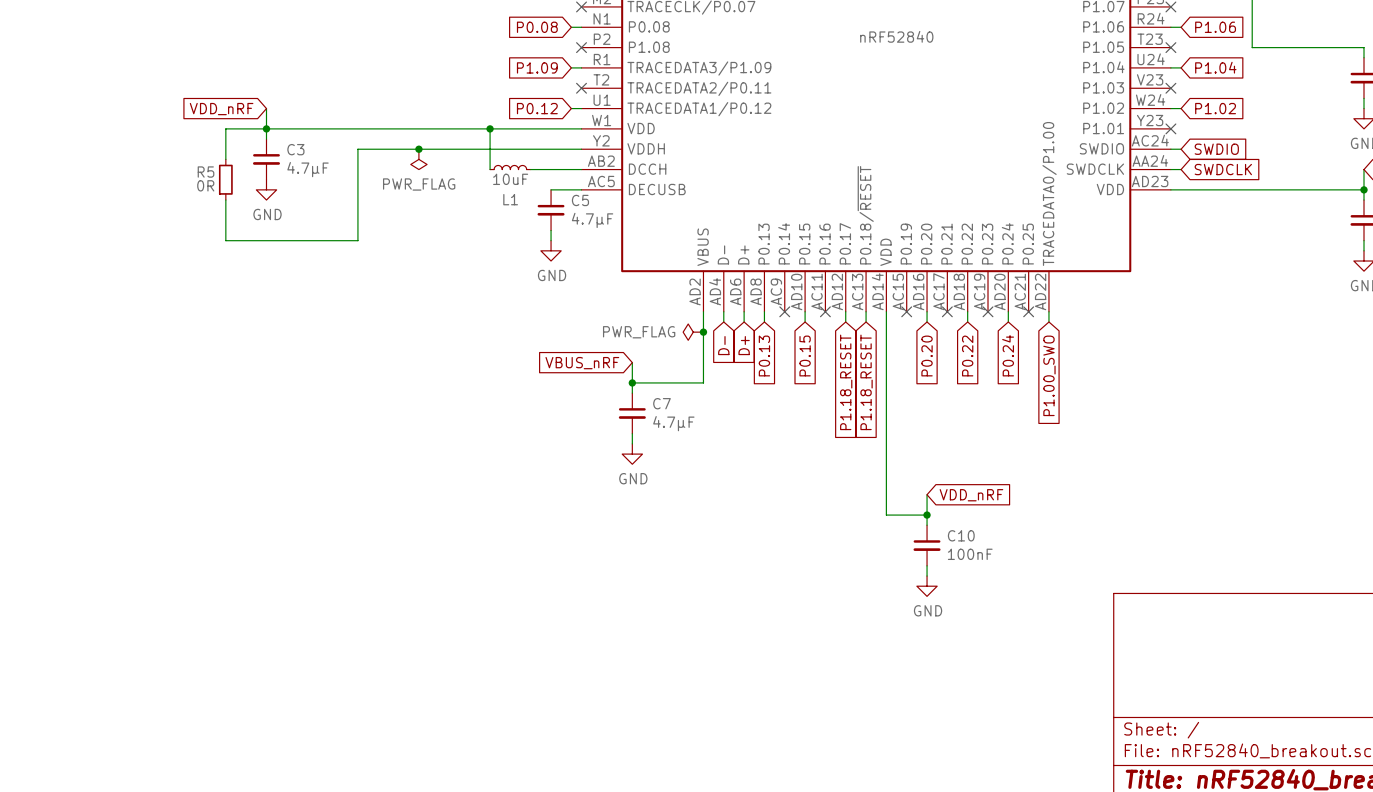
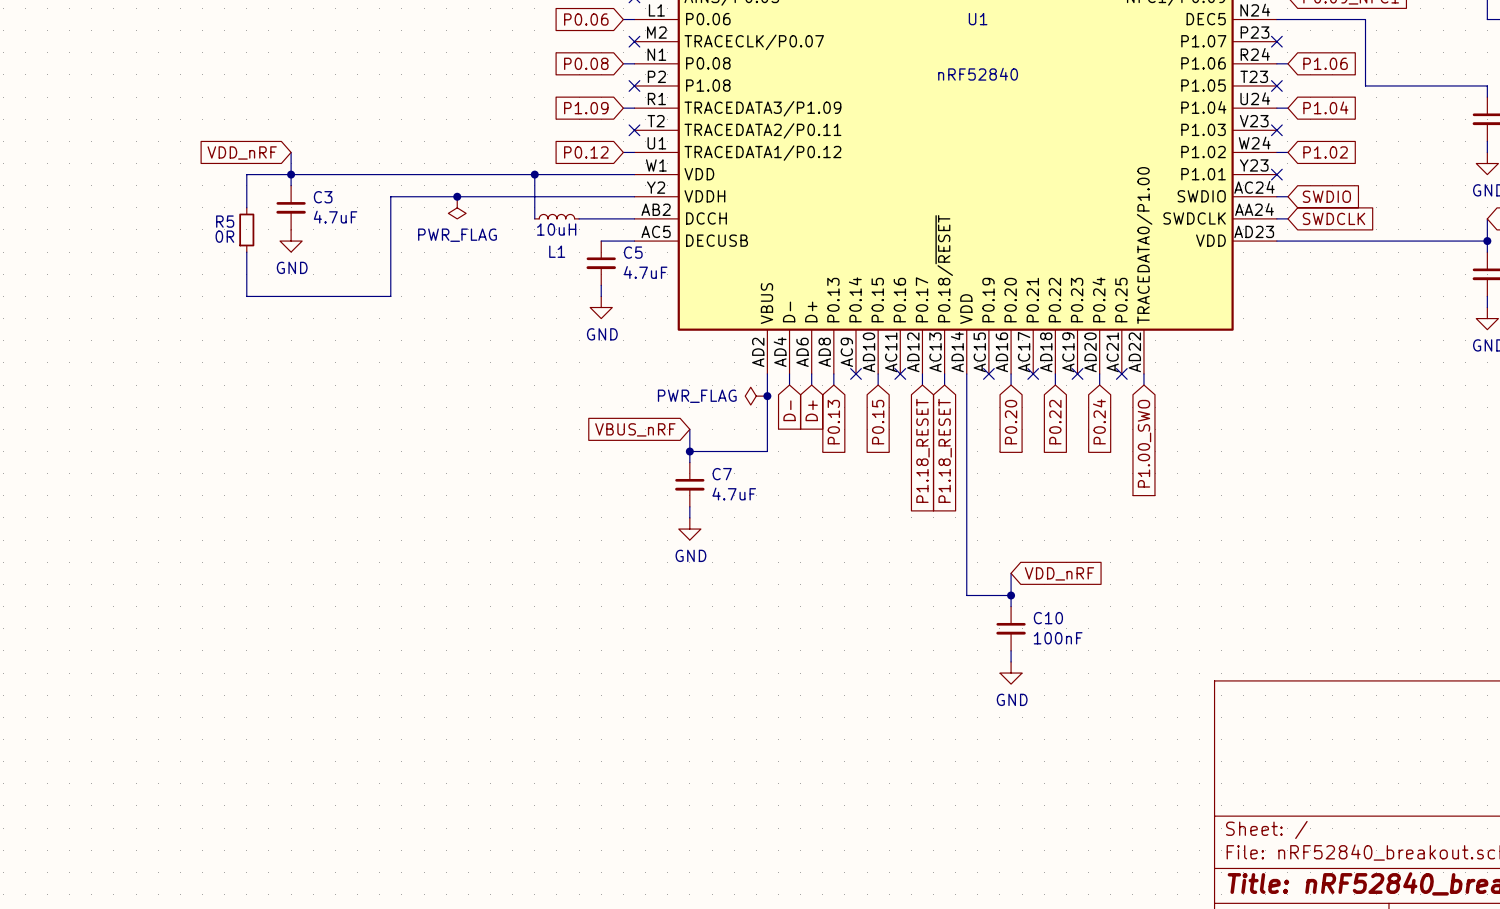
C3 value: 4.7µF (308, 169) -> 4.7uF (335, 217)
L1 value: 10uF (510, 179) -> 10uH (556, 229)
C5 value: 4.7µF (592, 220) -> 4.7uF (645, 272)
C7 value: 4.7µF (673, 423) -> 4.7uF (734, 494)

